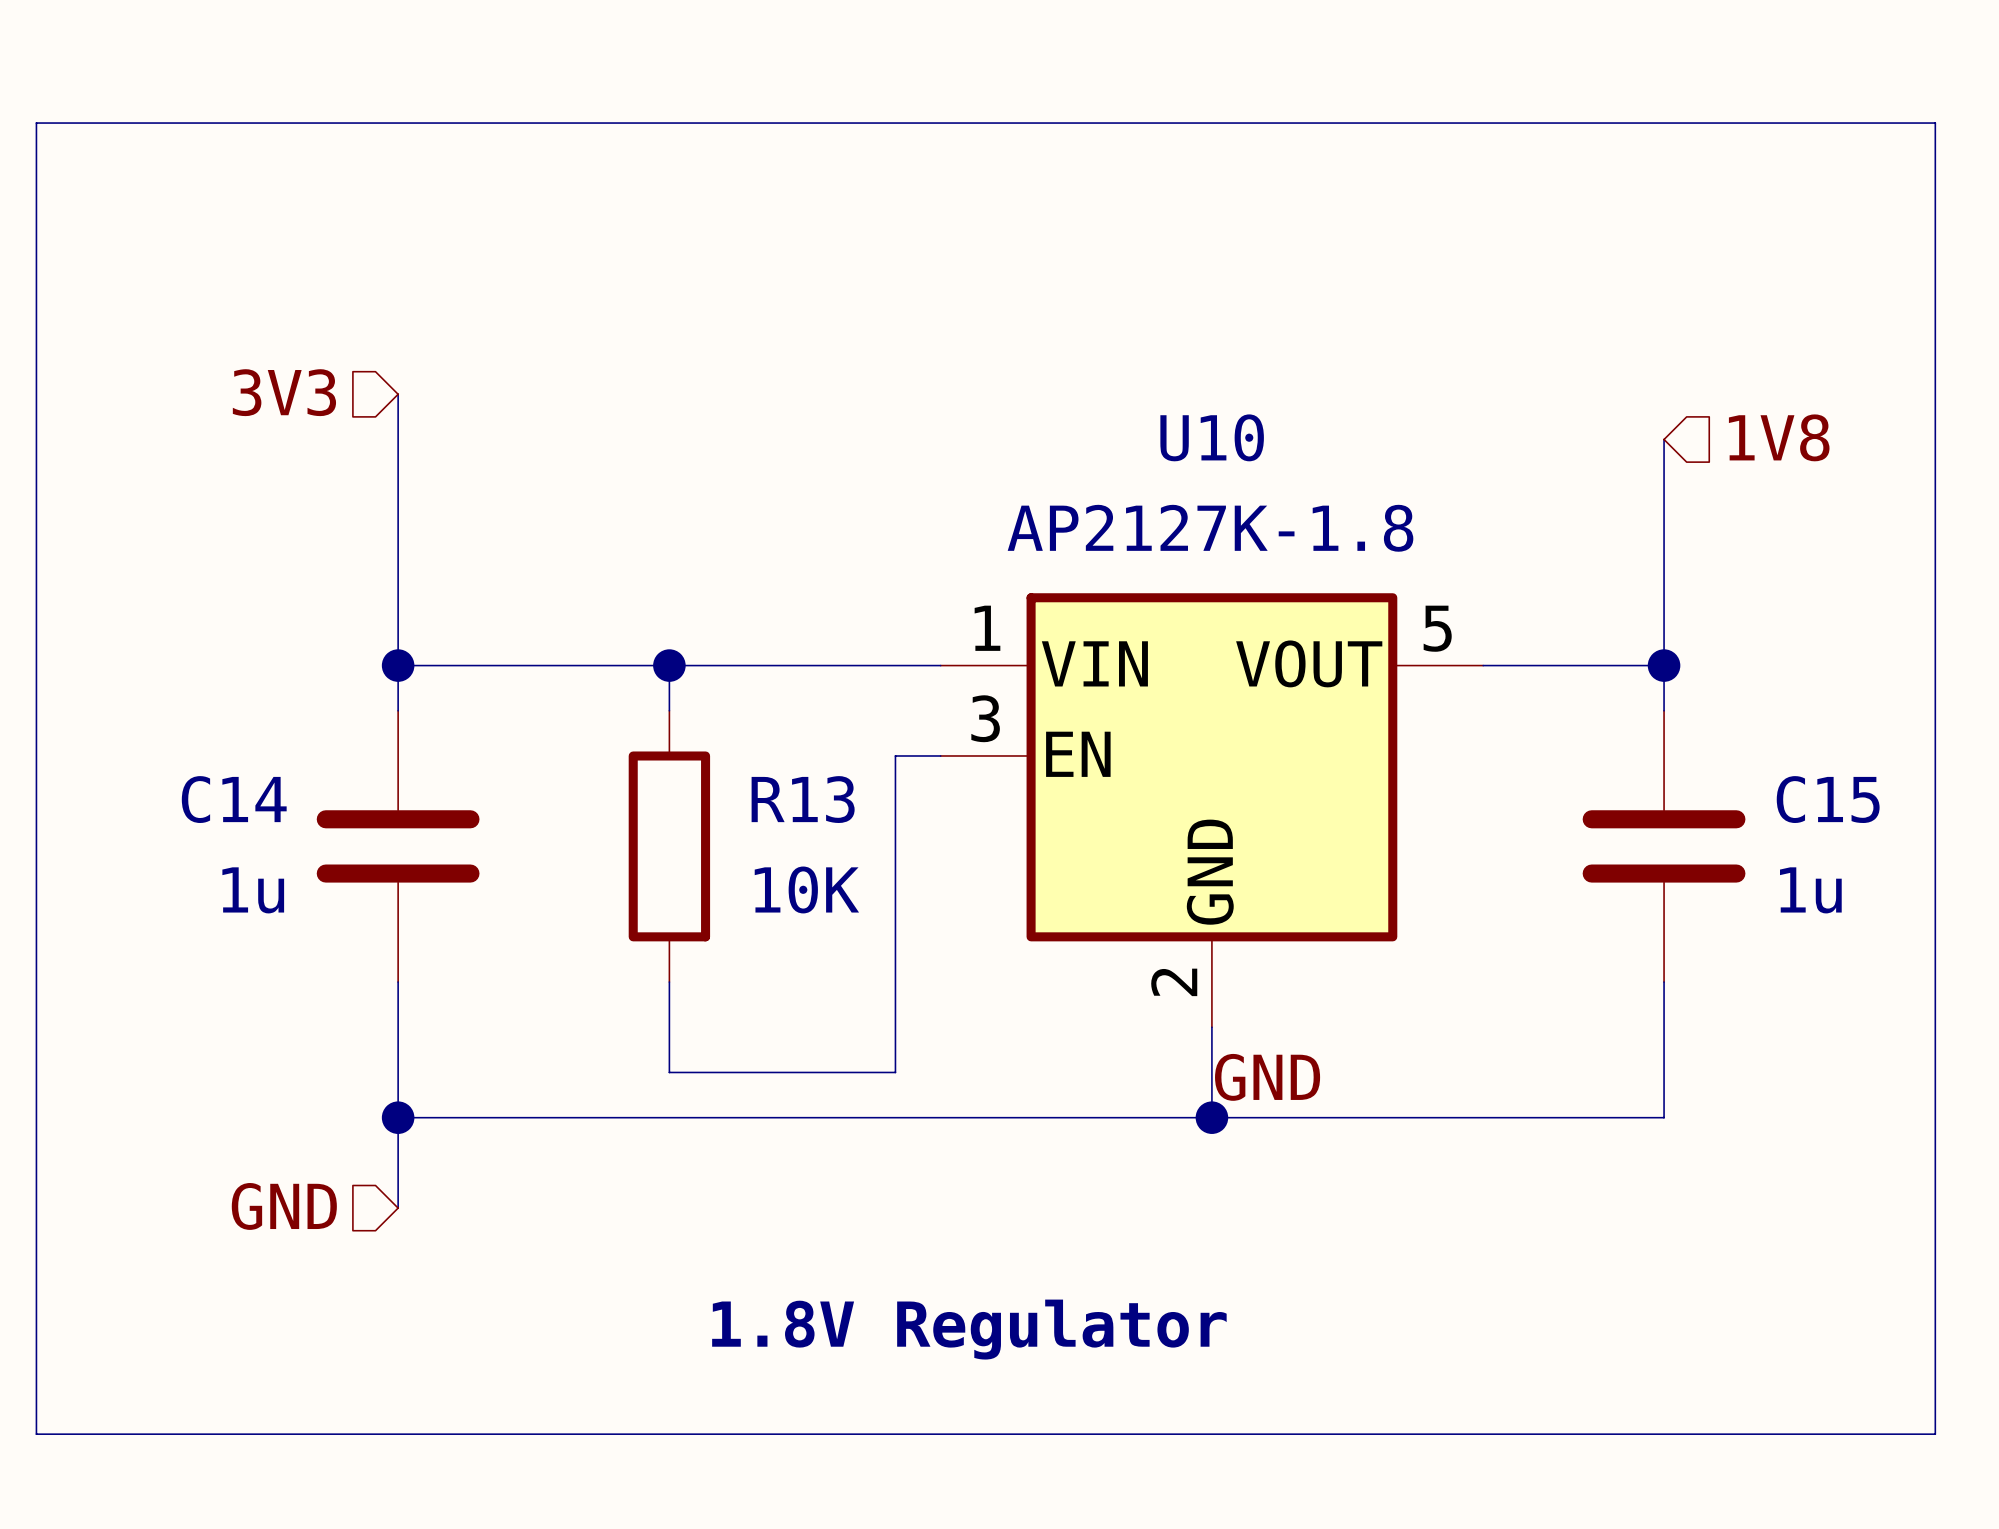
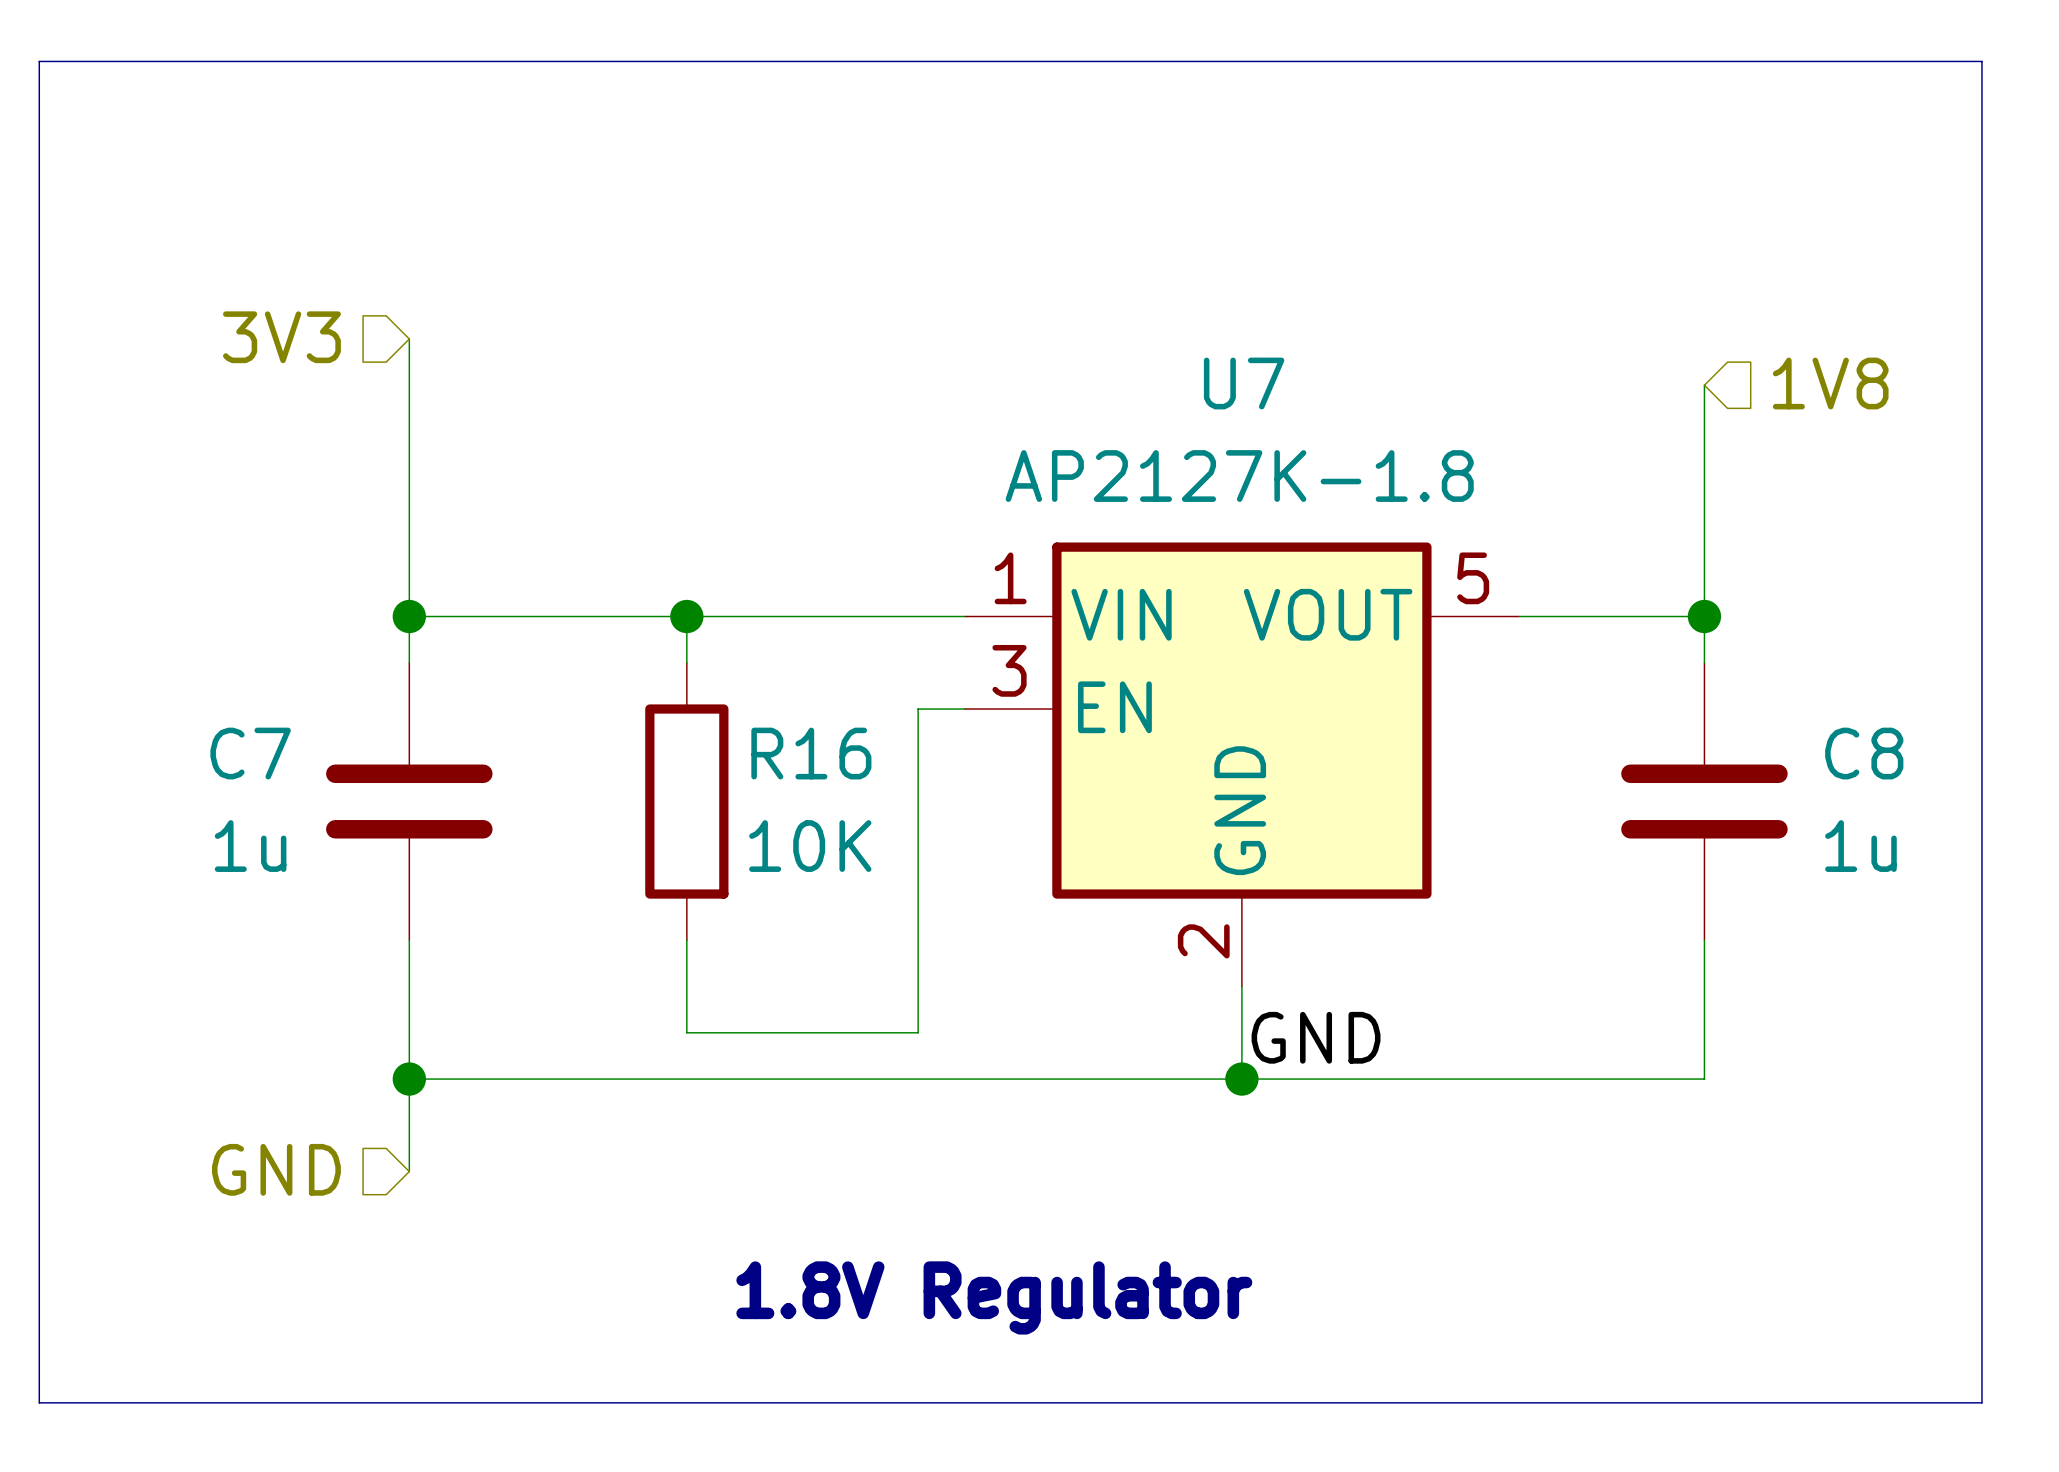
U10 name: U10 (1212, 437) -> U7 (1244, 383)
C14 name: C14 (234, 799) -> C7 (250, 753)
R13 name: R13 (803, 799) -> R16 (811, 753)
C15 name: C15 (1828, 799) -> C8 (1864, 753)

